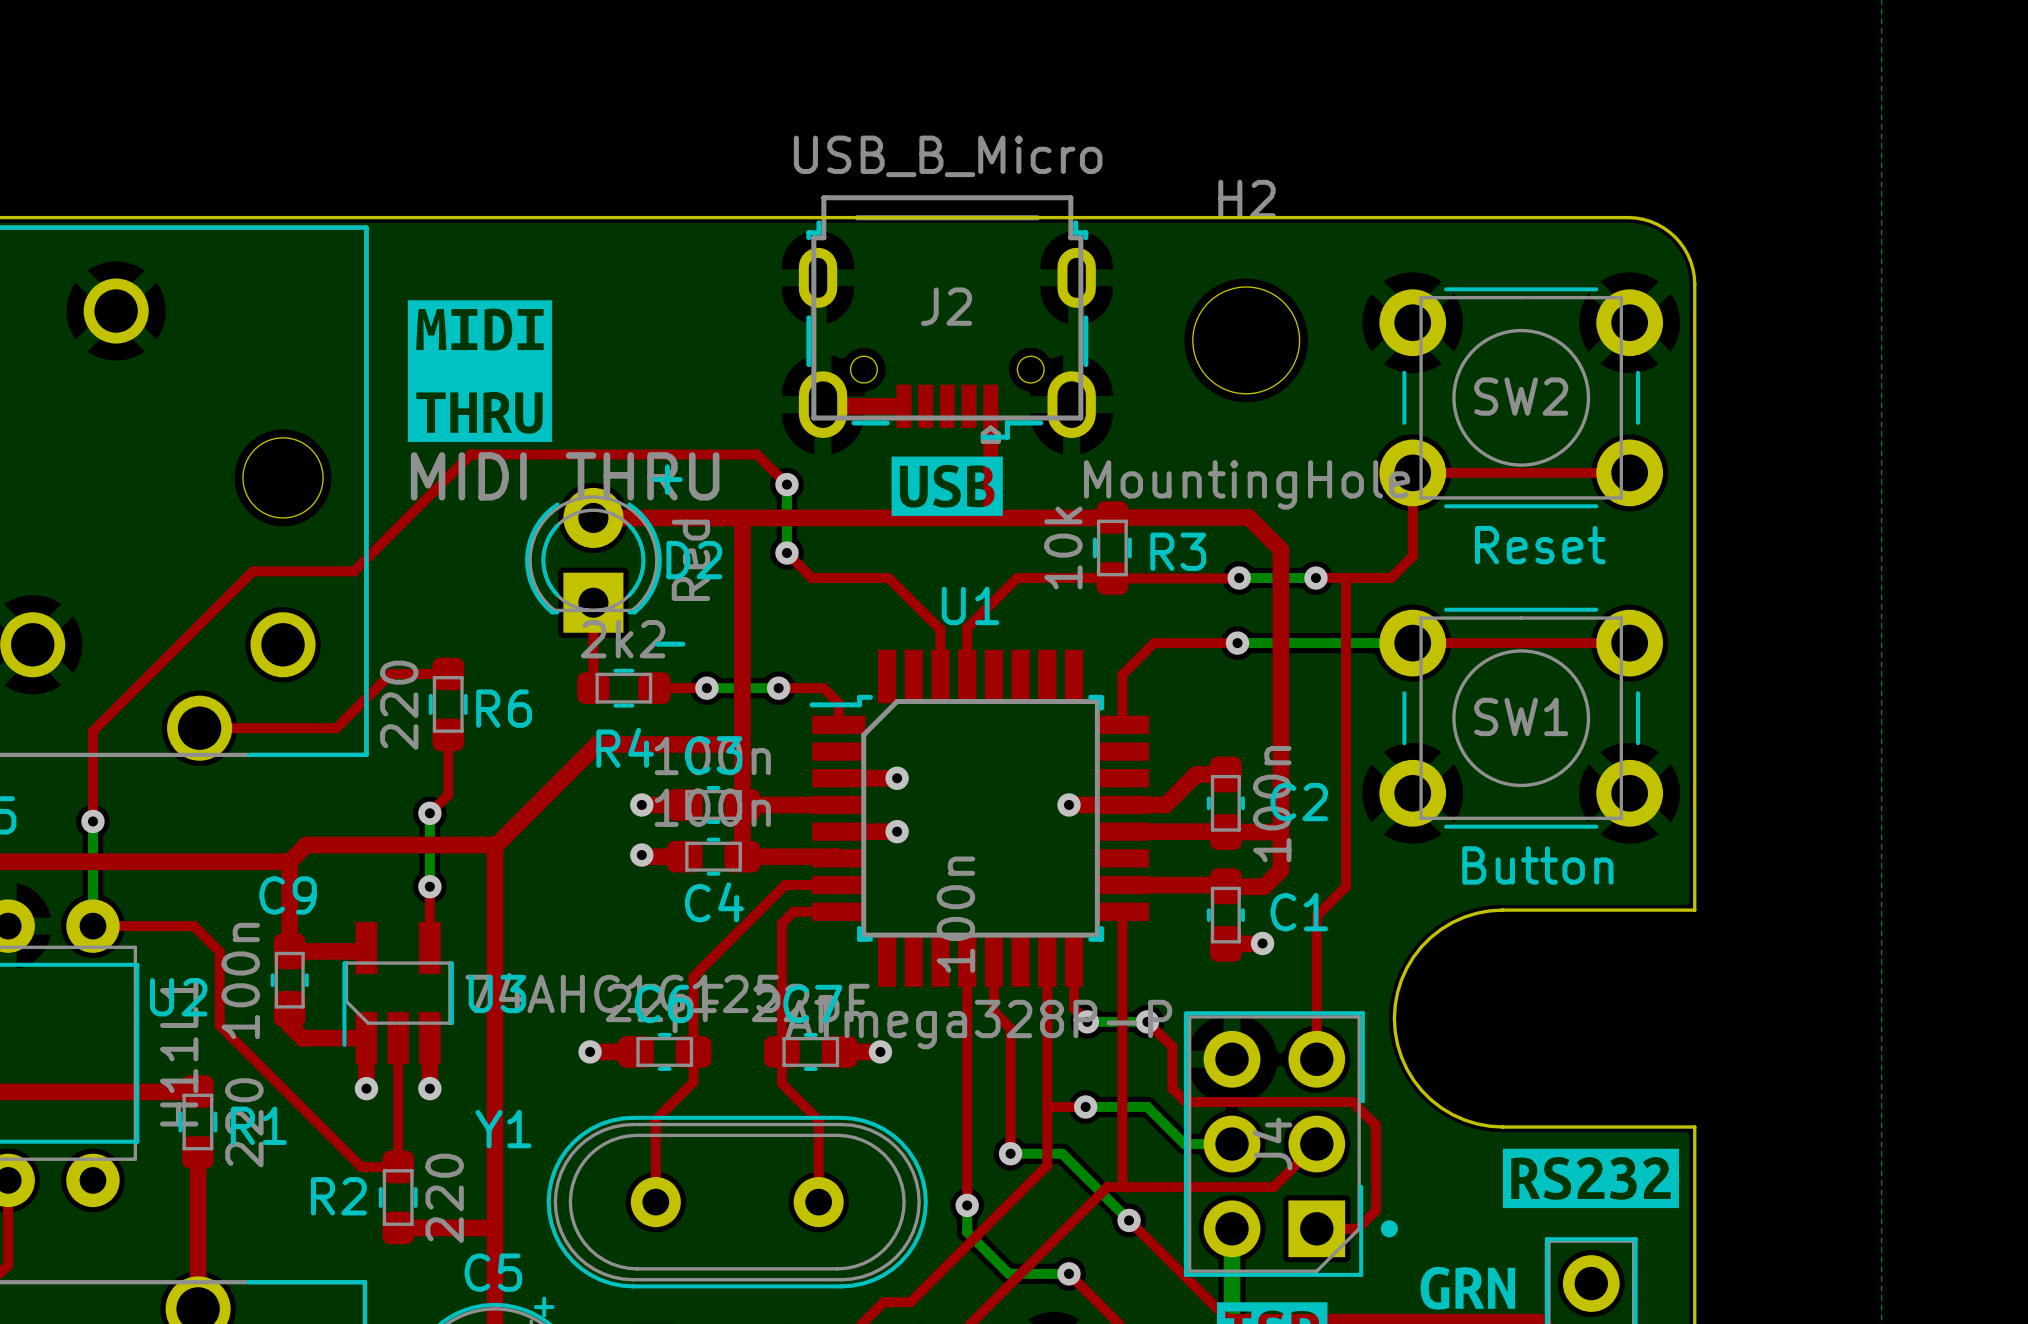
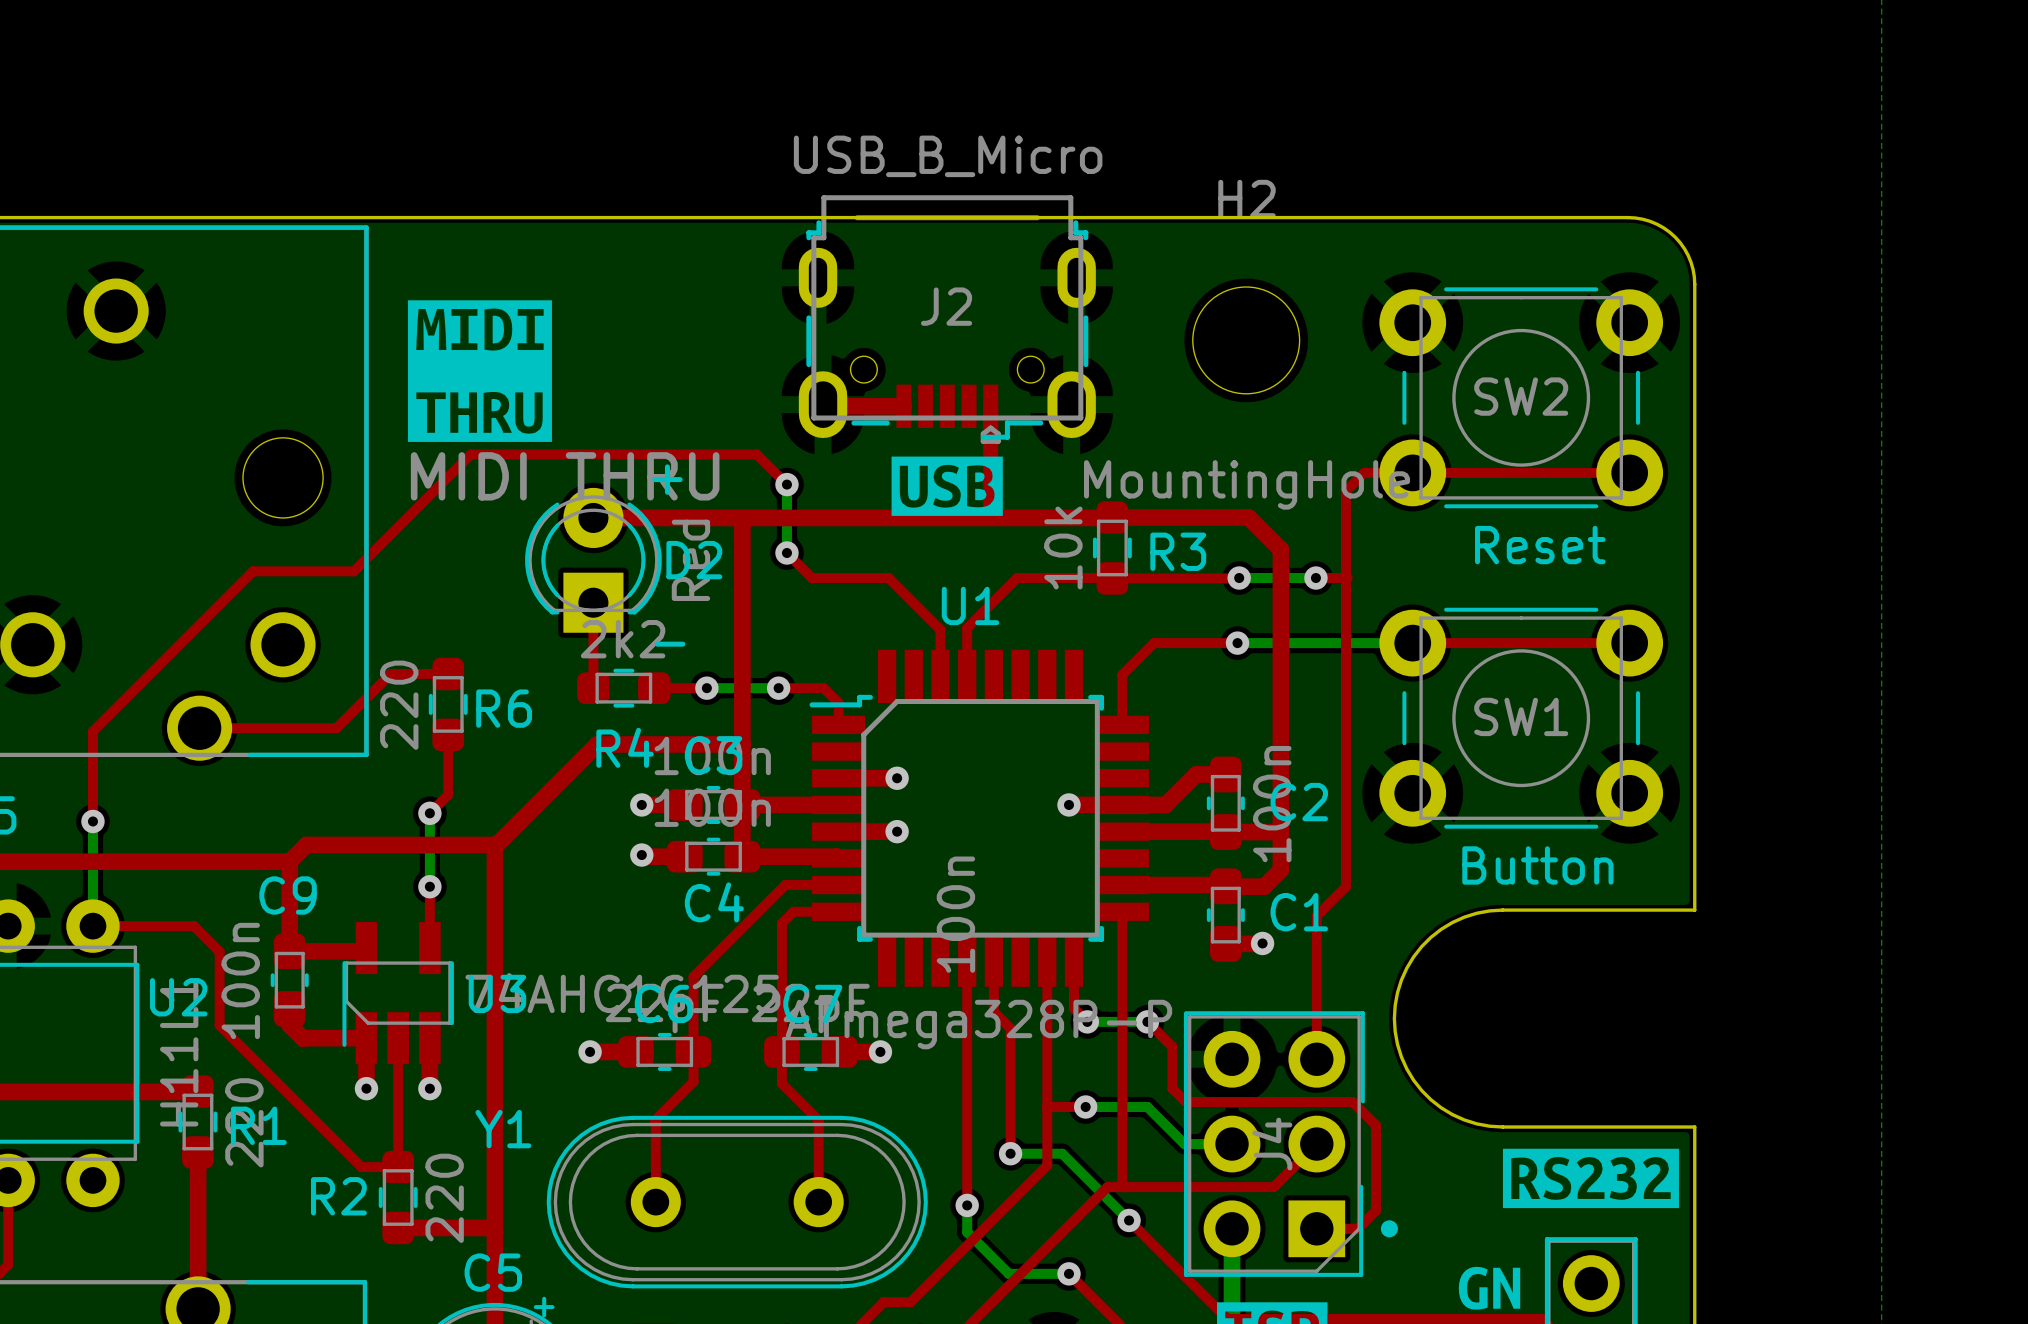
top track: (1412, 472) (1412, 556) (1391, 578) (1345, 578) -> (1412, 472) (1364, 472) (1345, 491) (1345, 579)
drawing shape: [1420, 1266, 1516, 1310] -> [1458, 1266, 1521, 1310]

